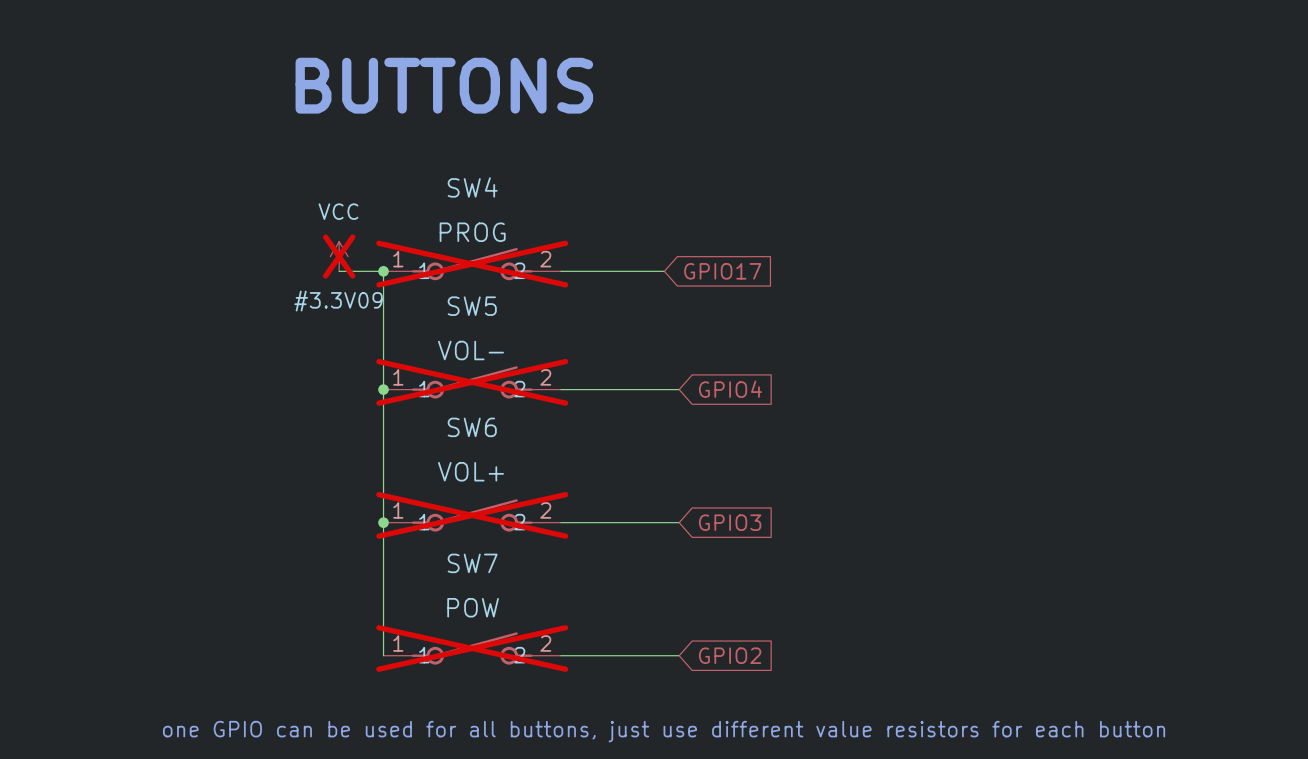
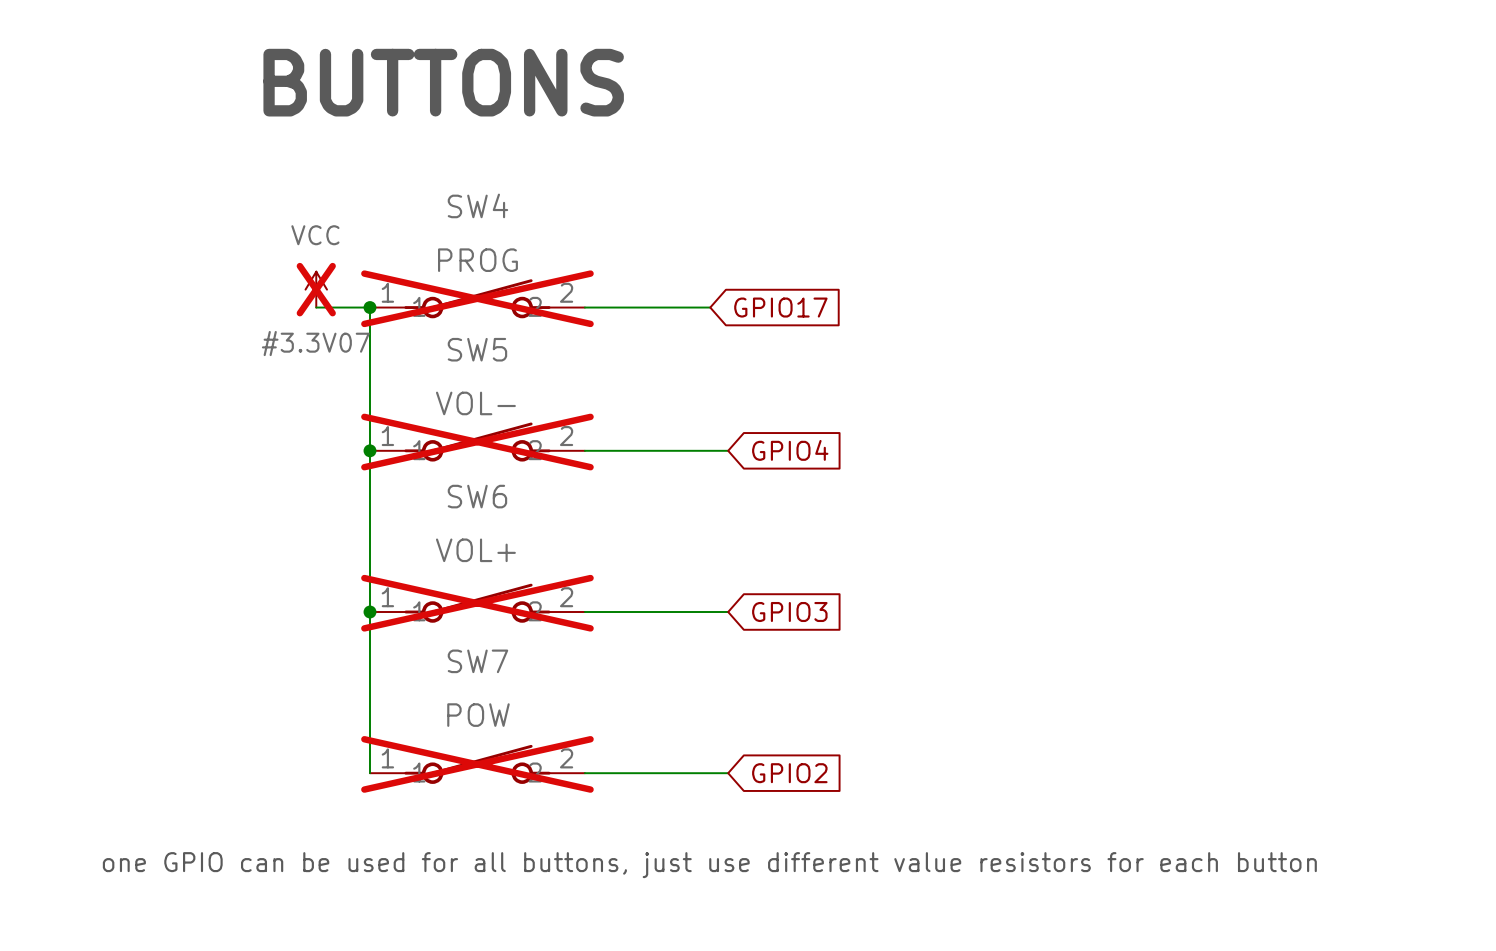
#3.3V09 name: #3.3V09 (338, 301) -> #3.3V07 (315, 343)

